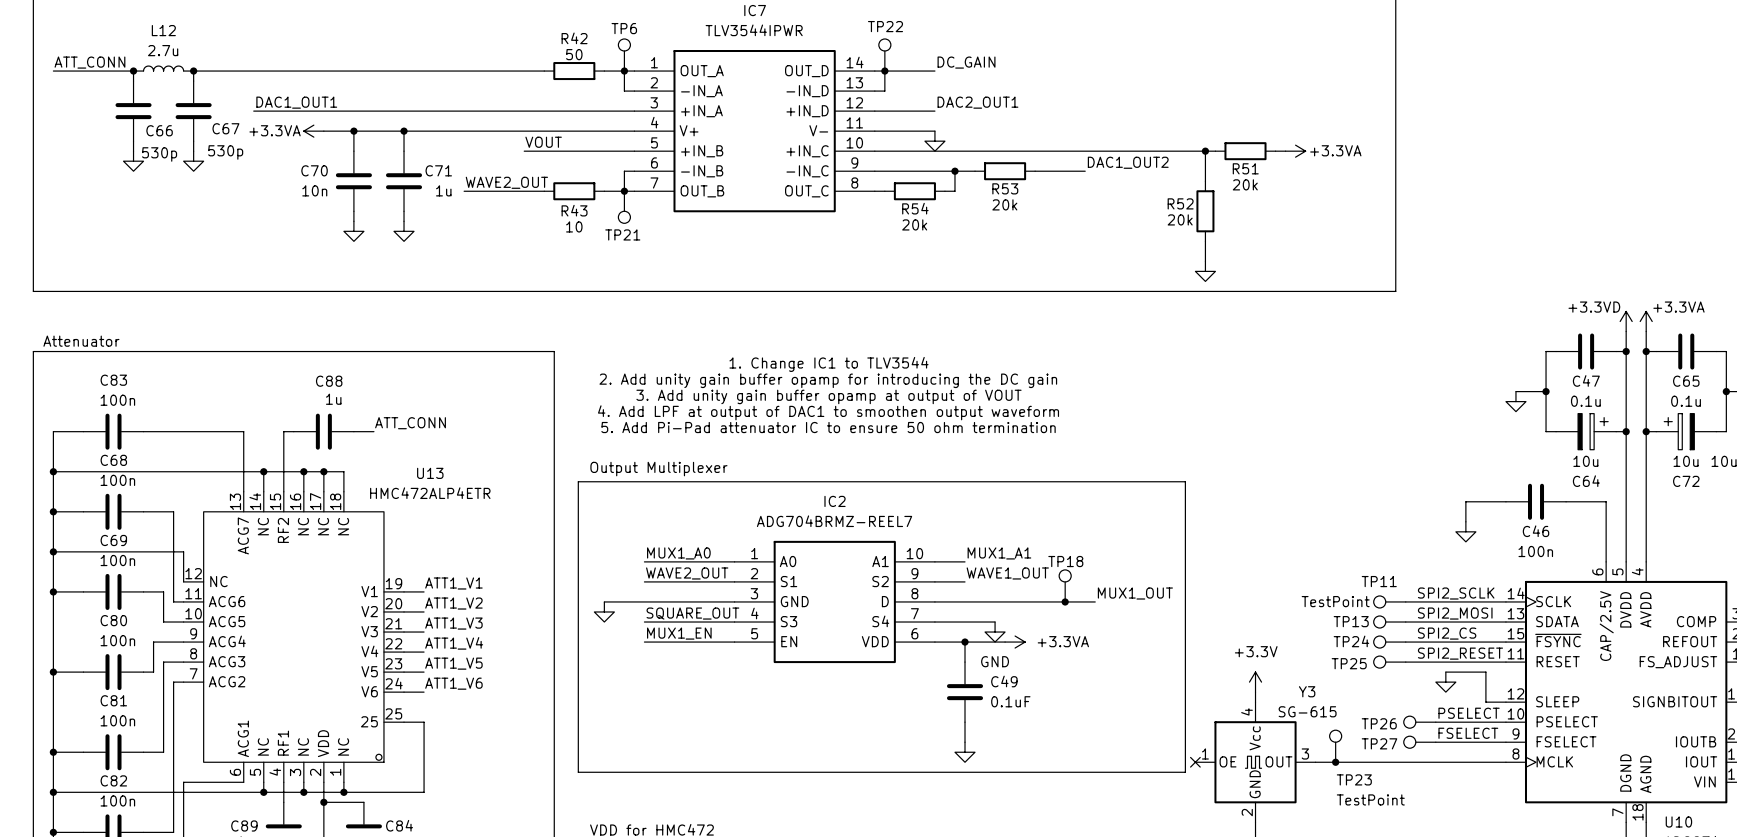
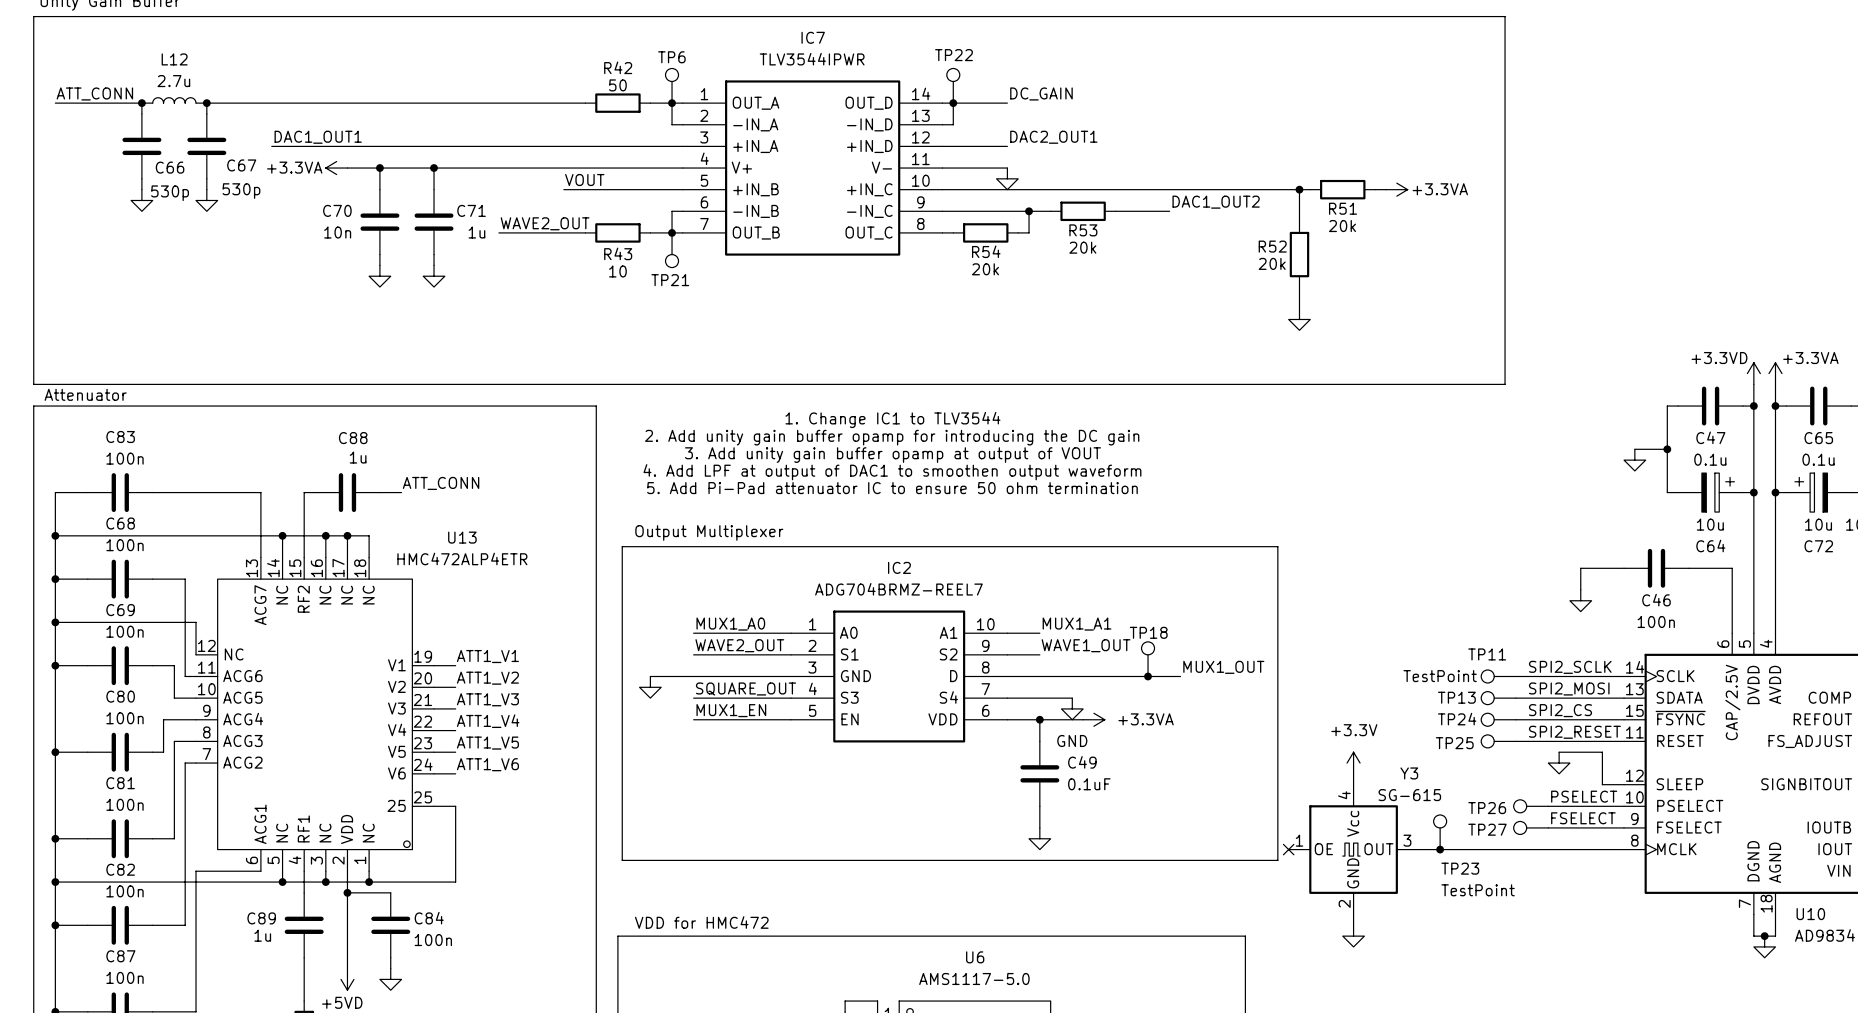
line: (33, 291) (1395, 291) -> (33, 341) (33, 384) (1505, 384) (1505, 341)

